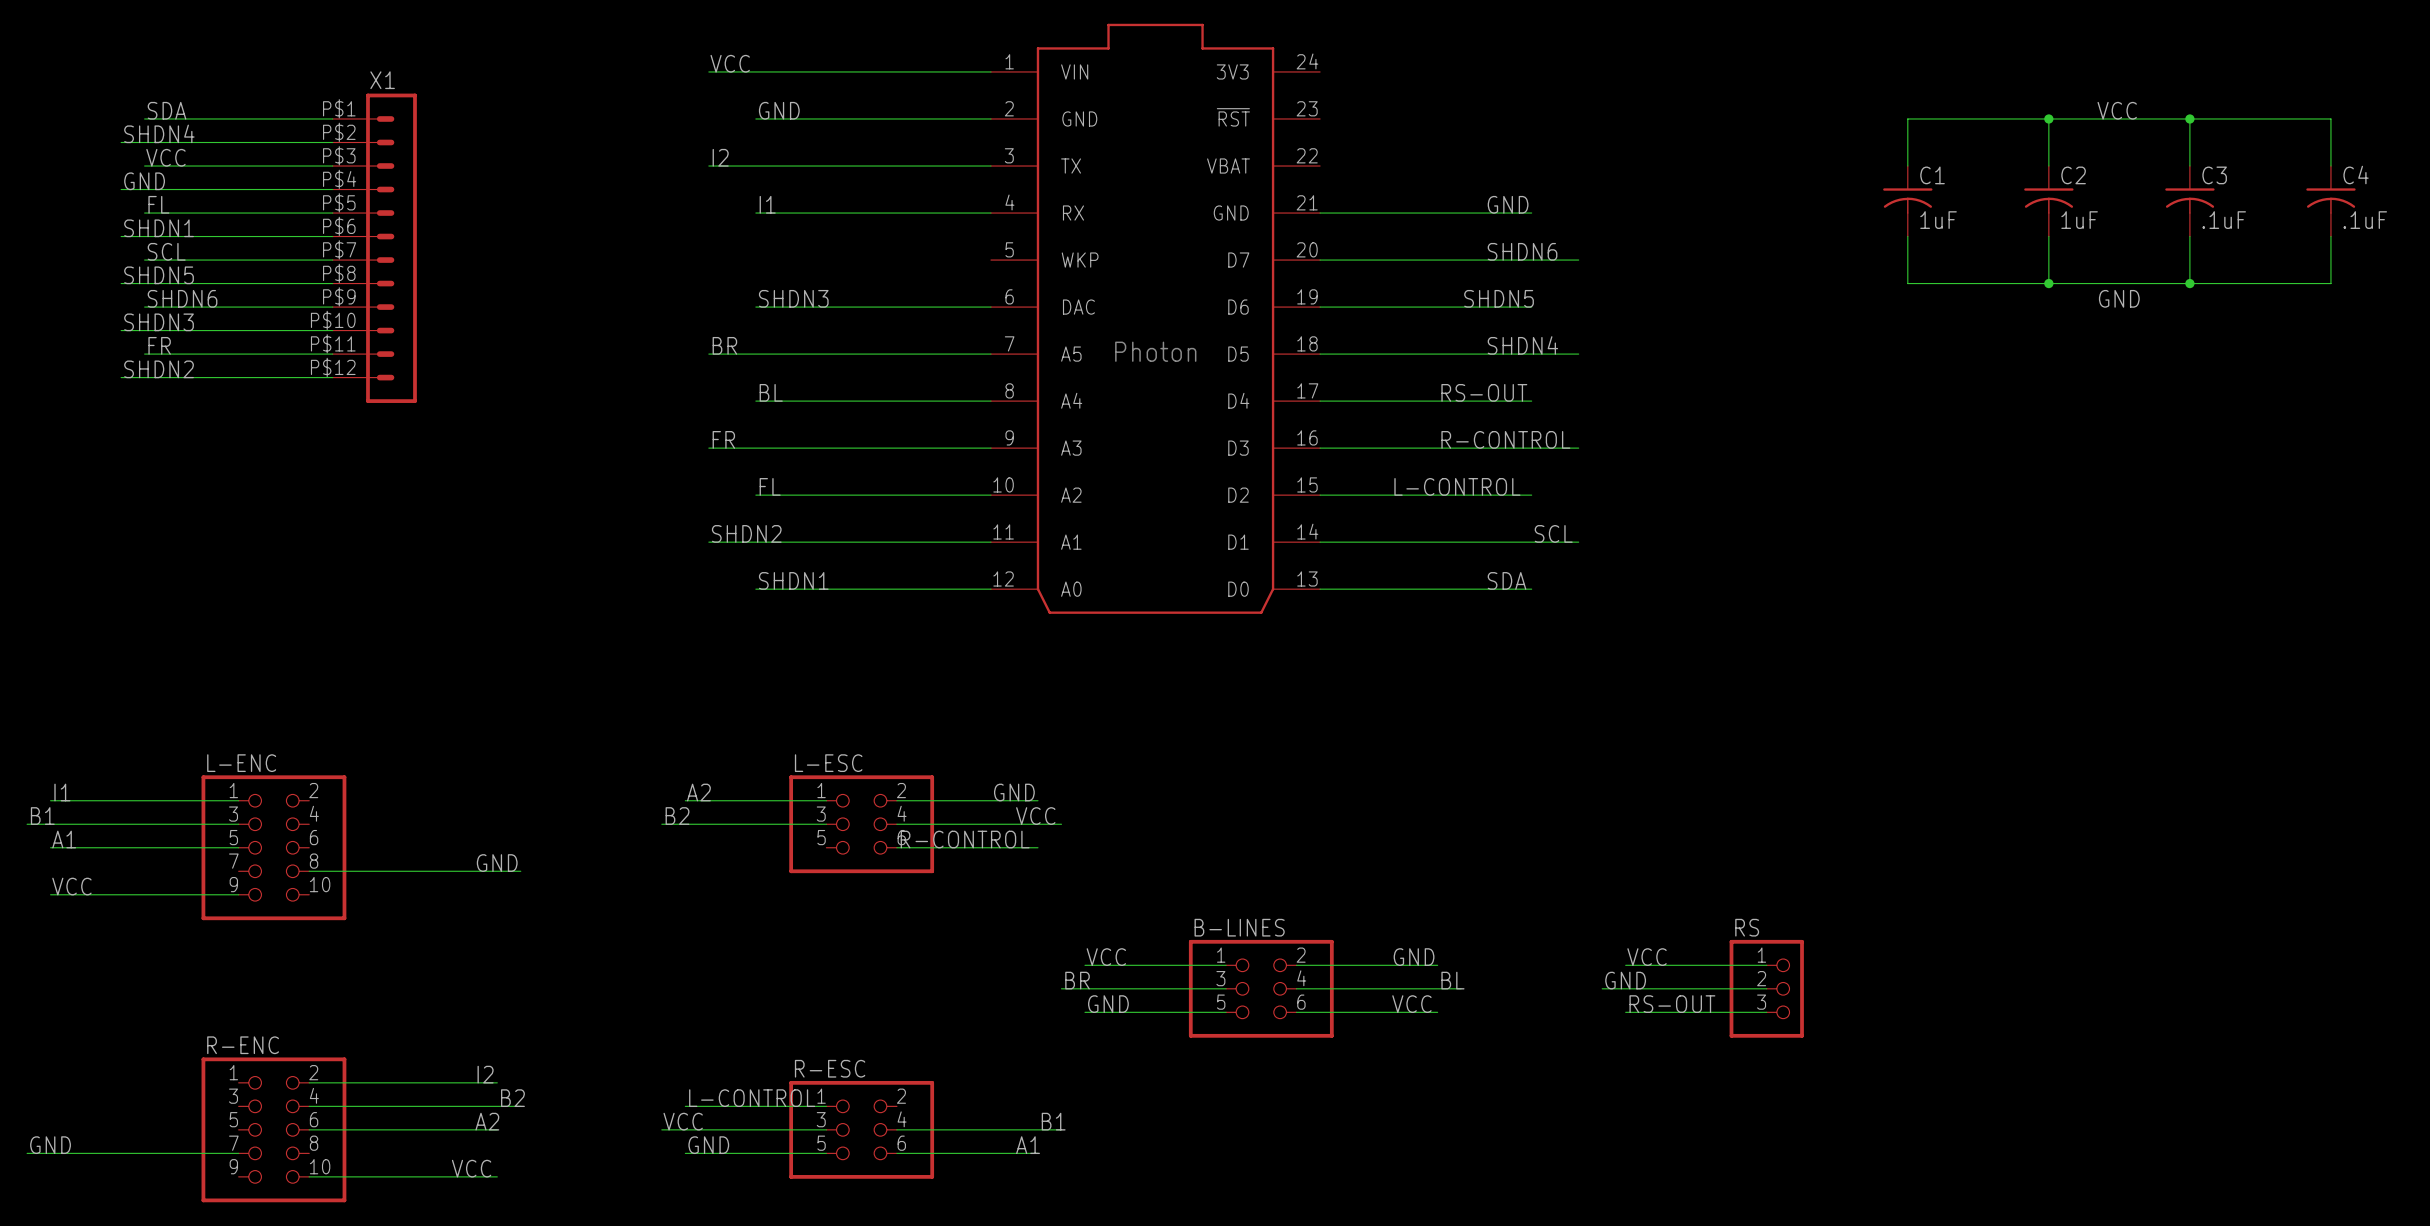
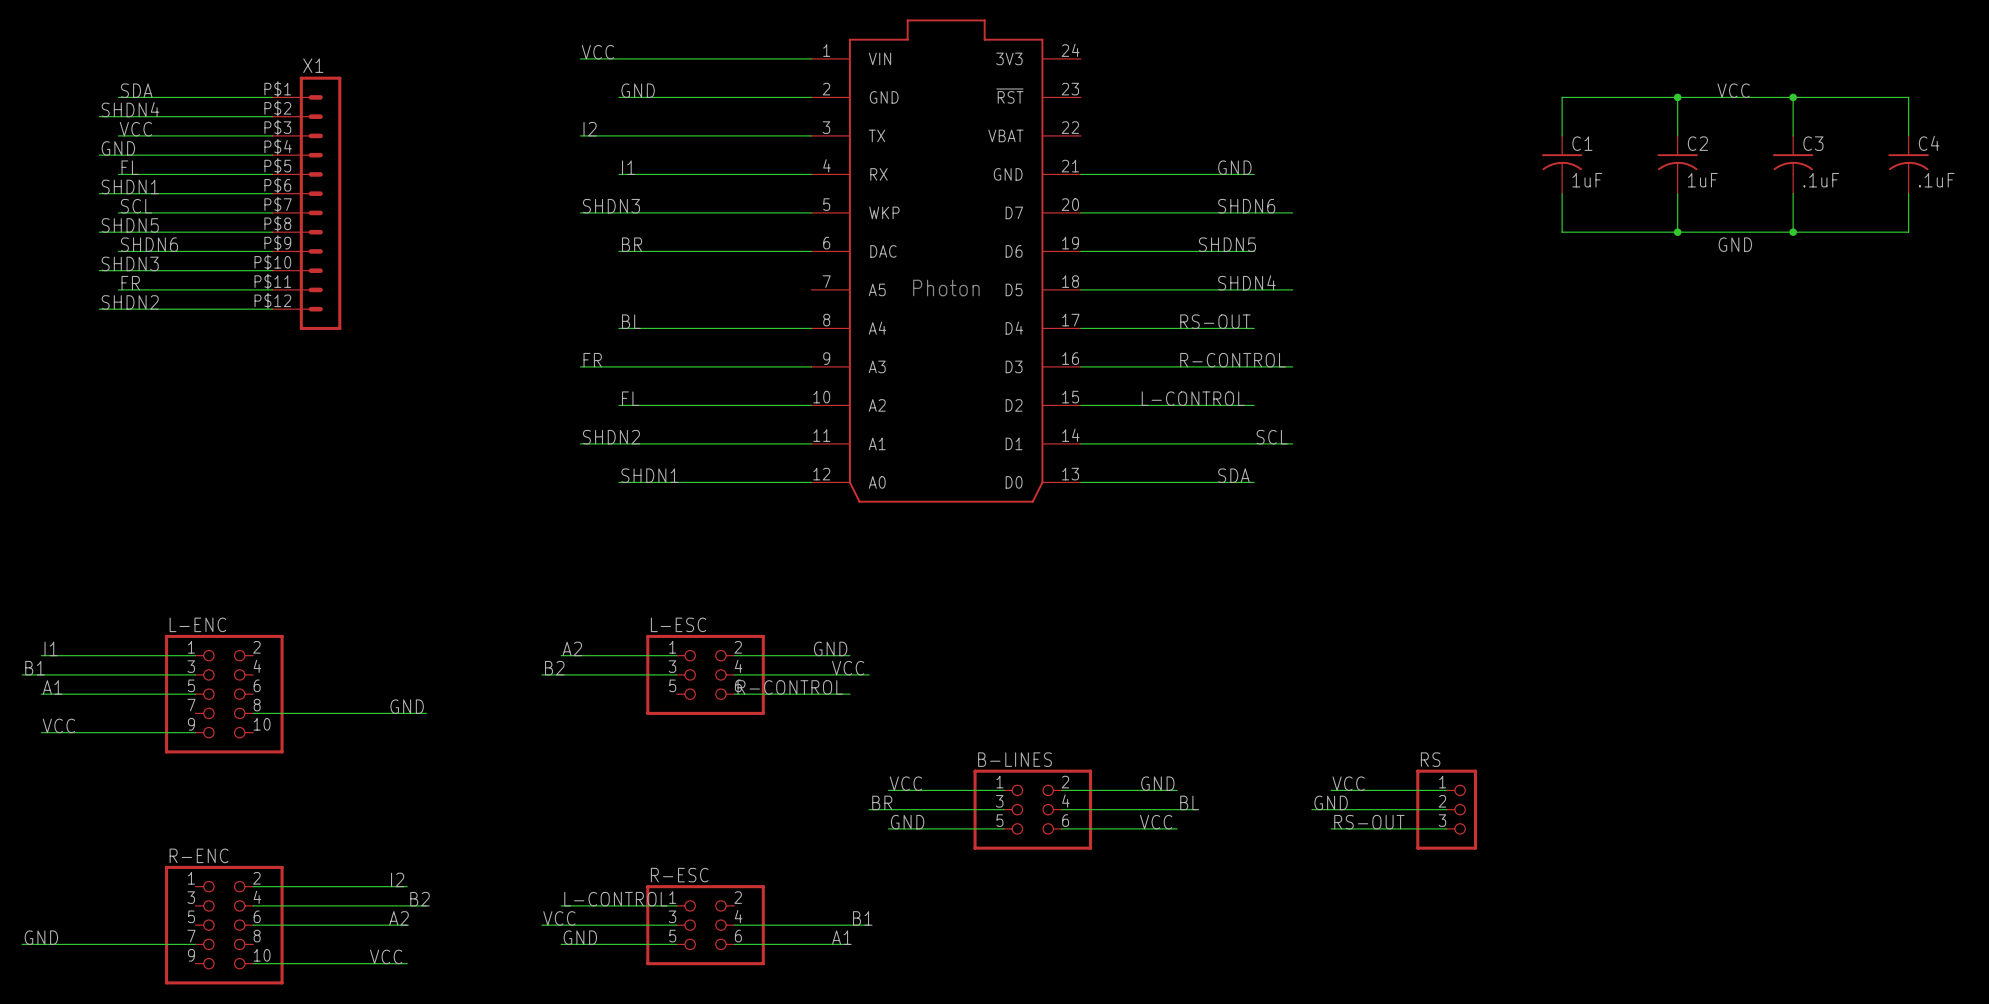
label: none -> SHDN3 (611, 206)
label: SHDN3 (793, 298) -> BR (632, 244)
label: BR (724, 345) -> none
wire: (708, 354) (990, 354) -> (580, 212) (811, 212)

